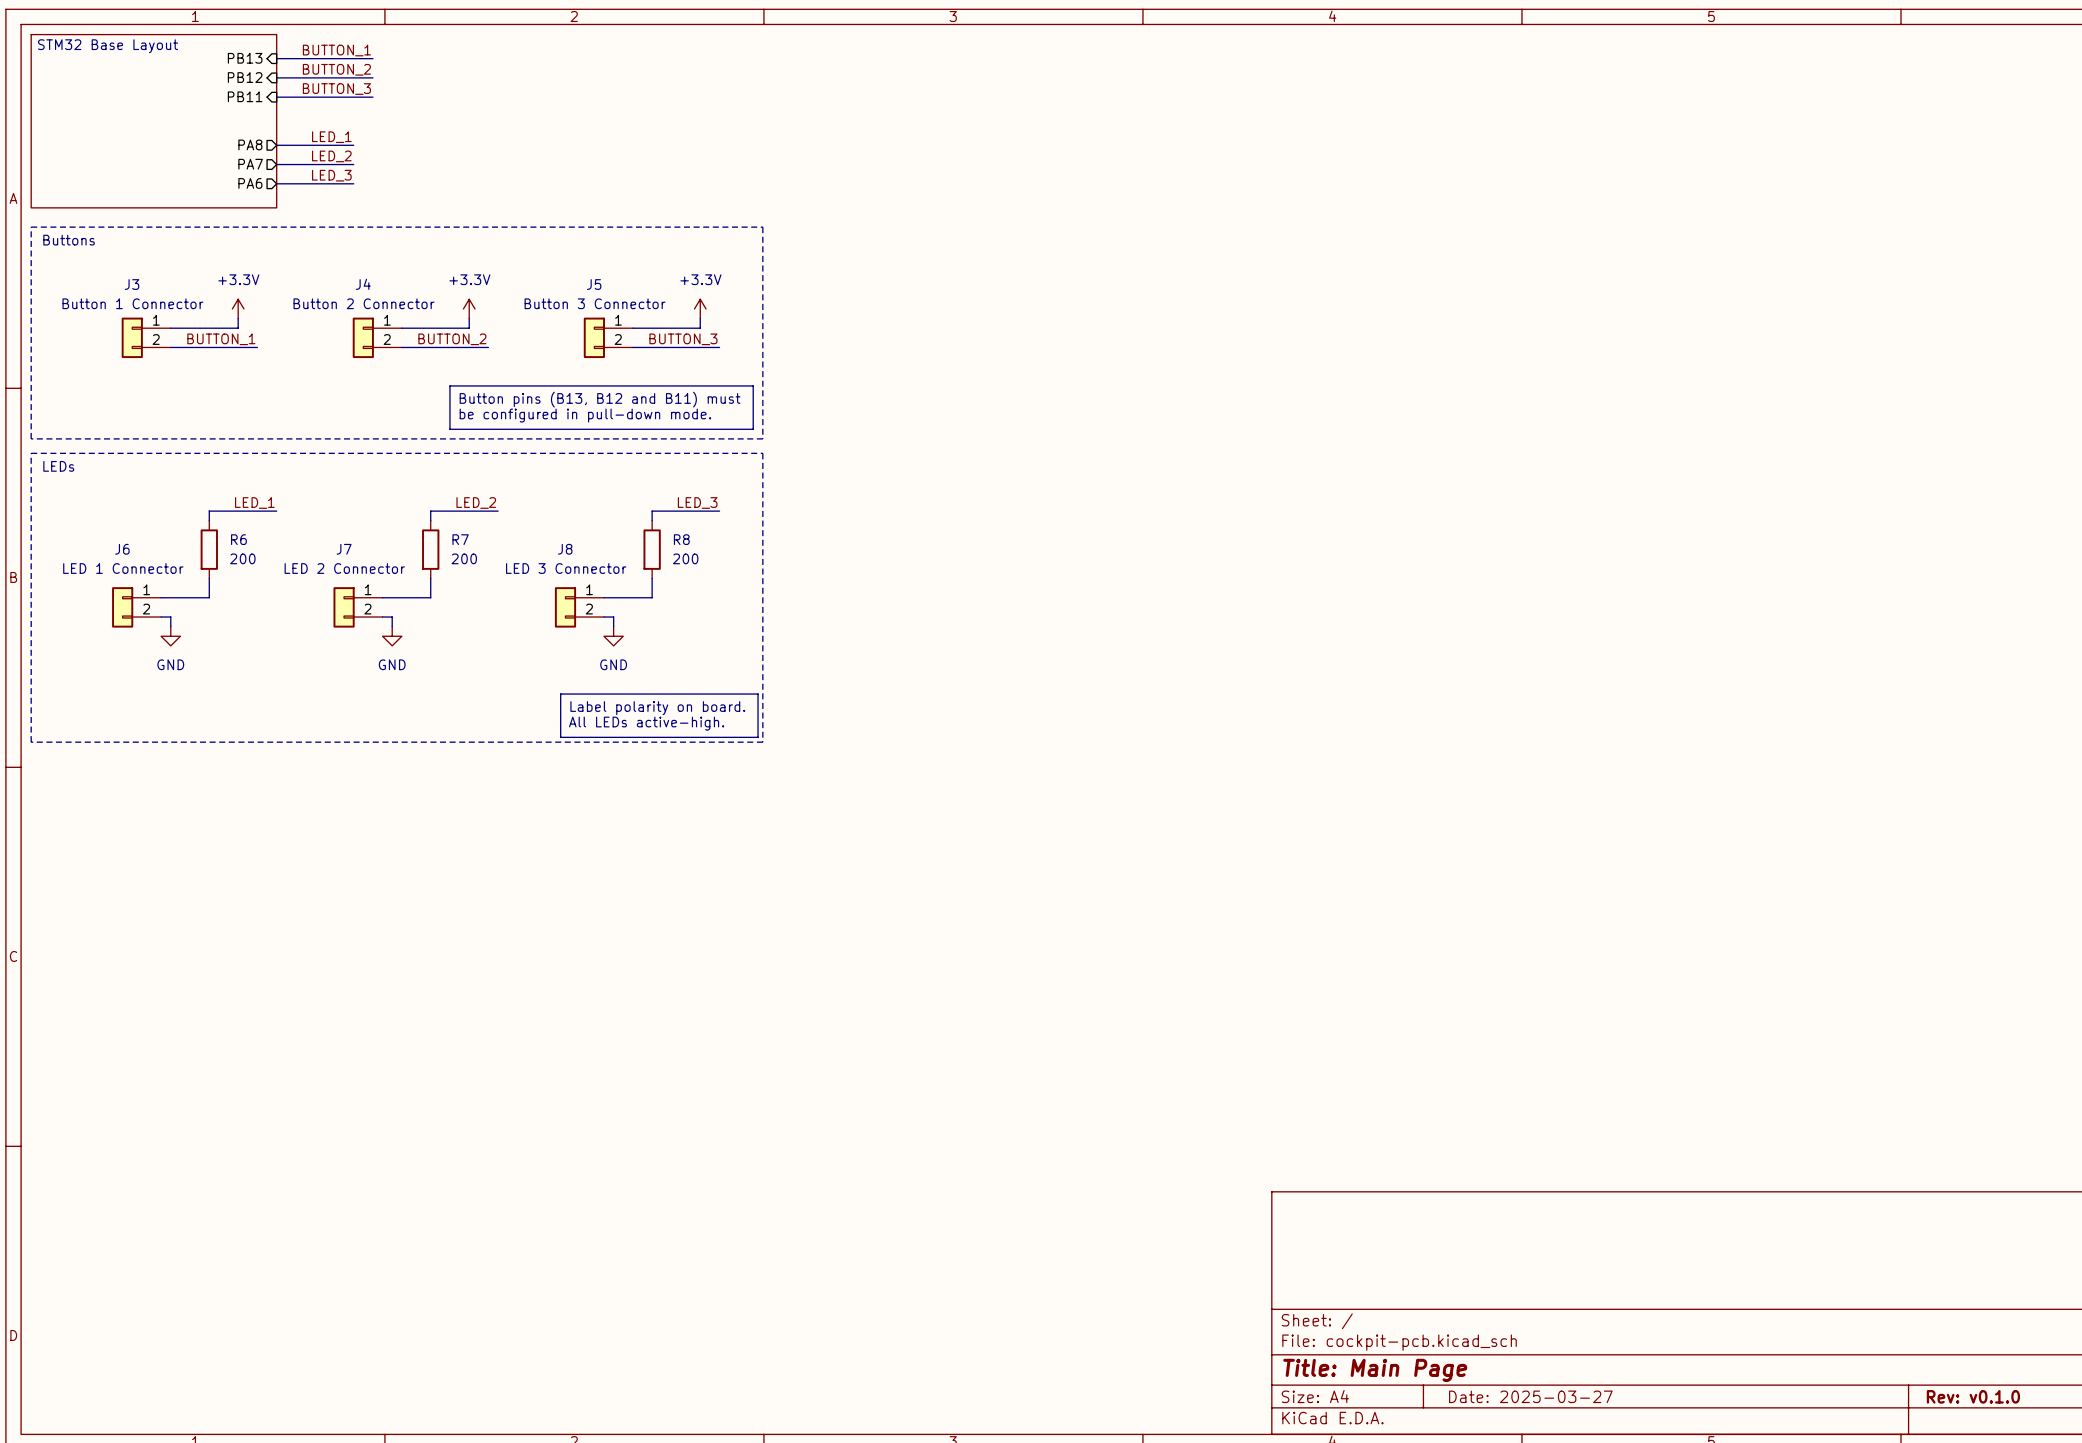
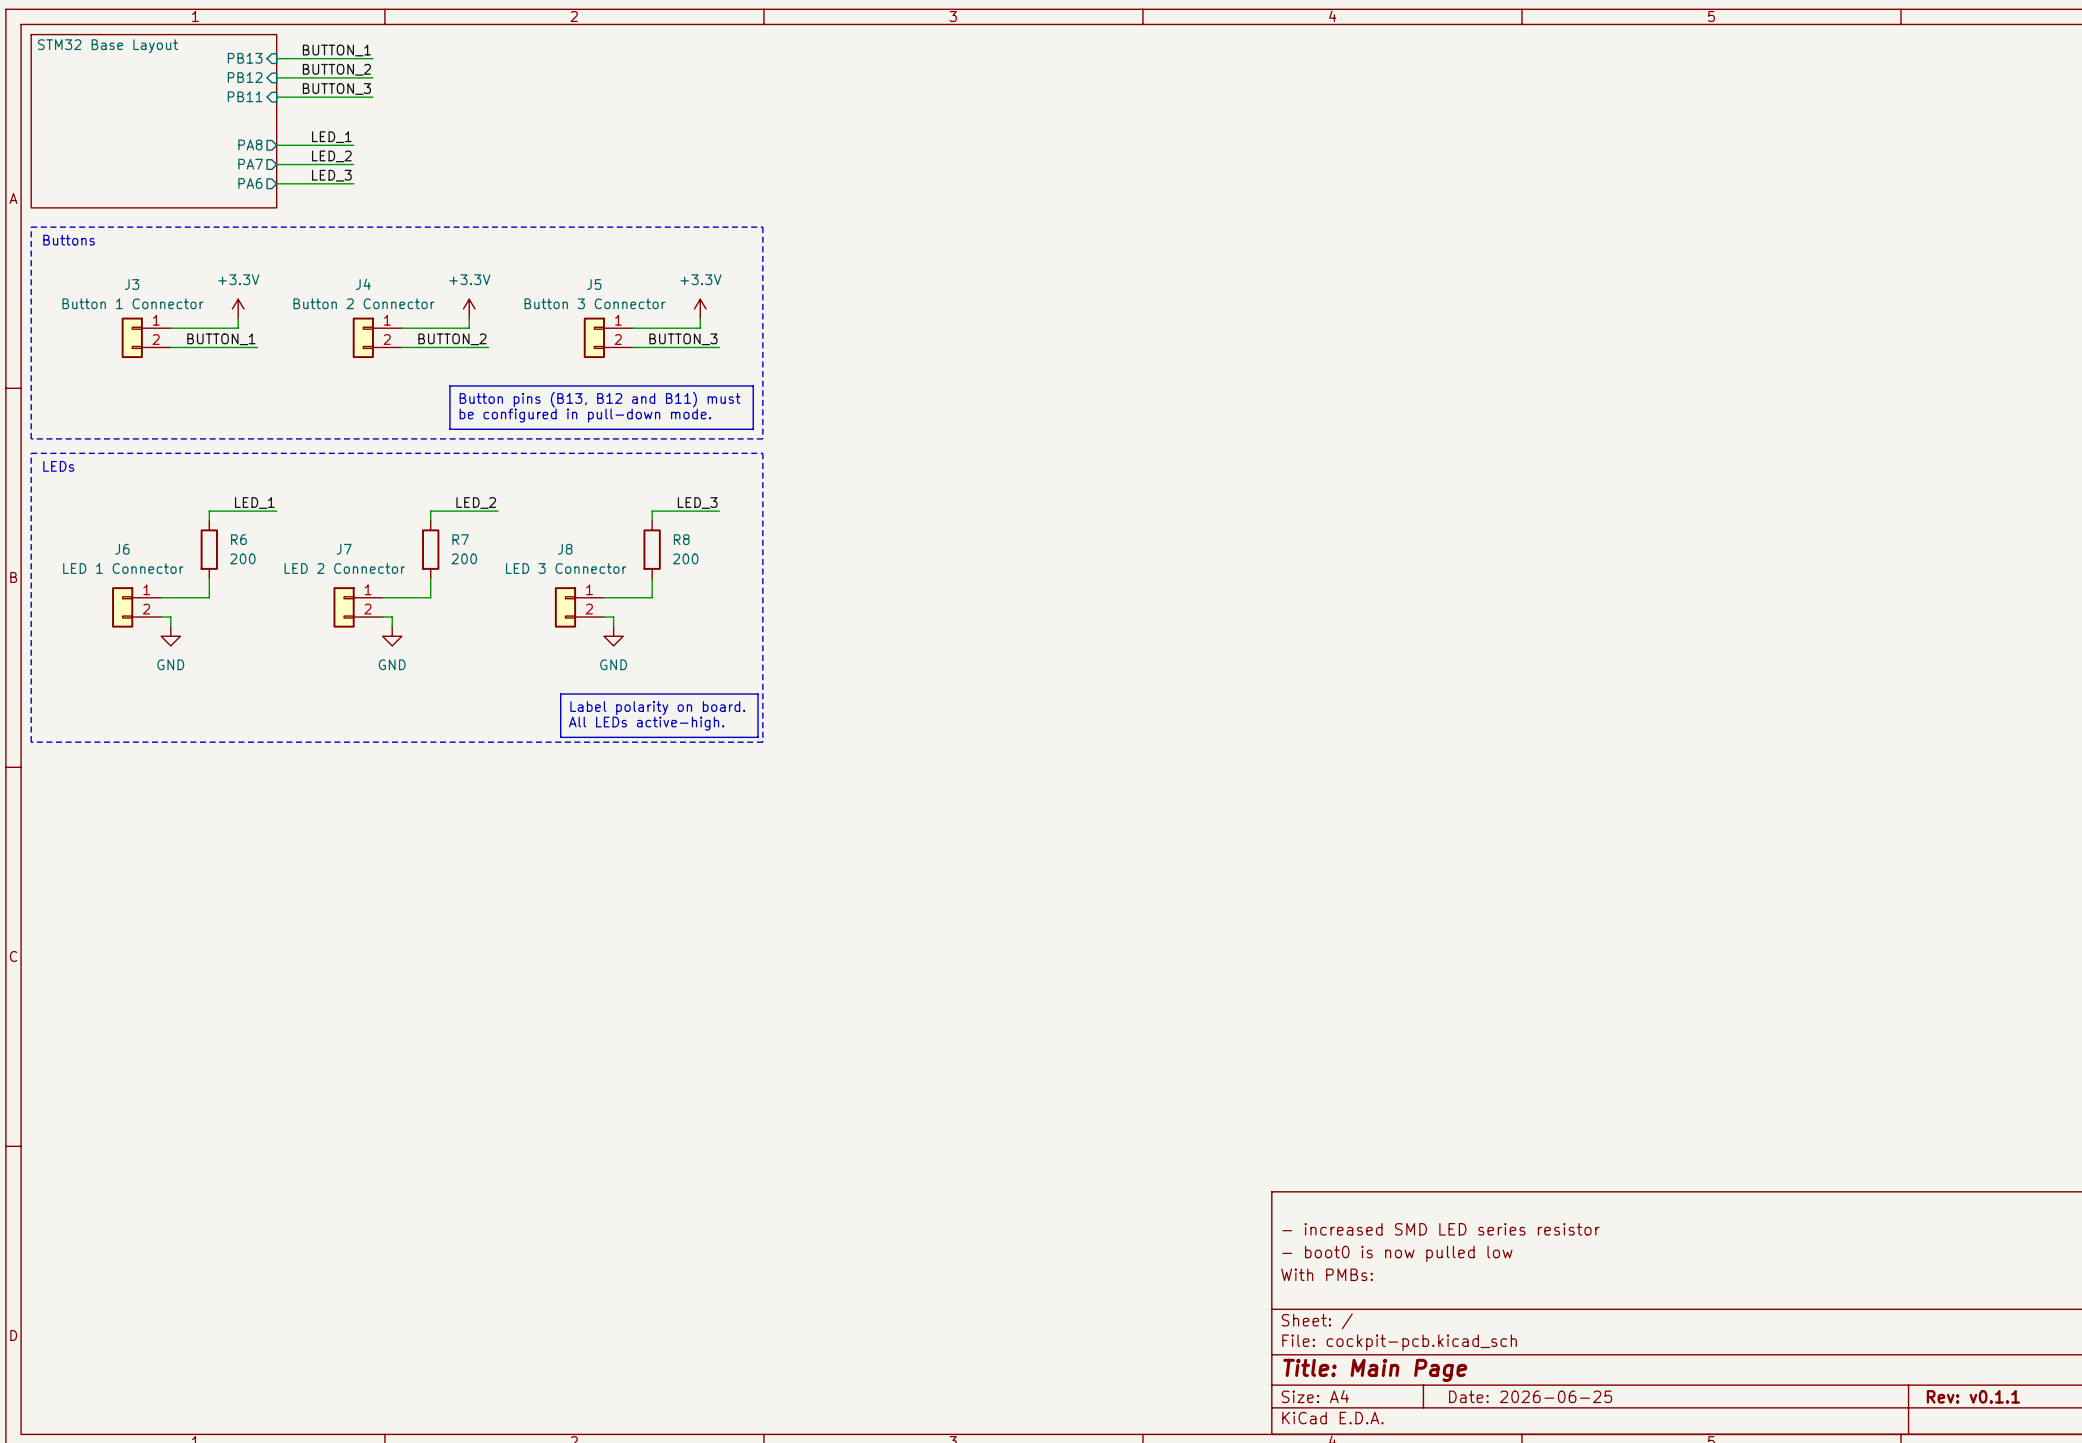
title block: none -> - increased SMD LED series resistor (1440, 1229)
title block: none -> - boot0 is now pulled low (1397, 1253)
title block: none -> With PMBs: (1327, 1274)
title block: Date: 2025-03-27 (1530, 1396) -> Date: 2026-06-25 (1530, 1396)
title block: Rev: v0.1.0 (1973, 1396) -> Rev: v0.1.1 (1973, 1396)

